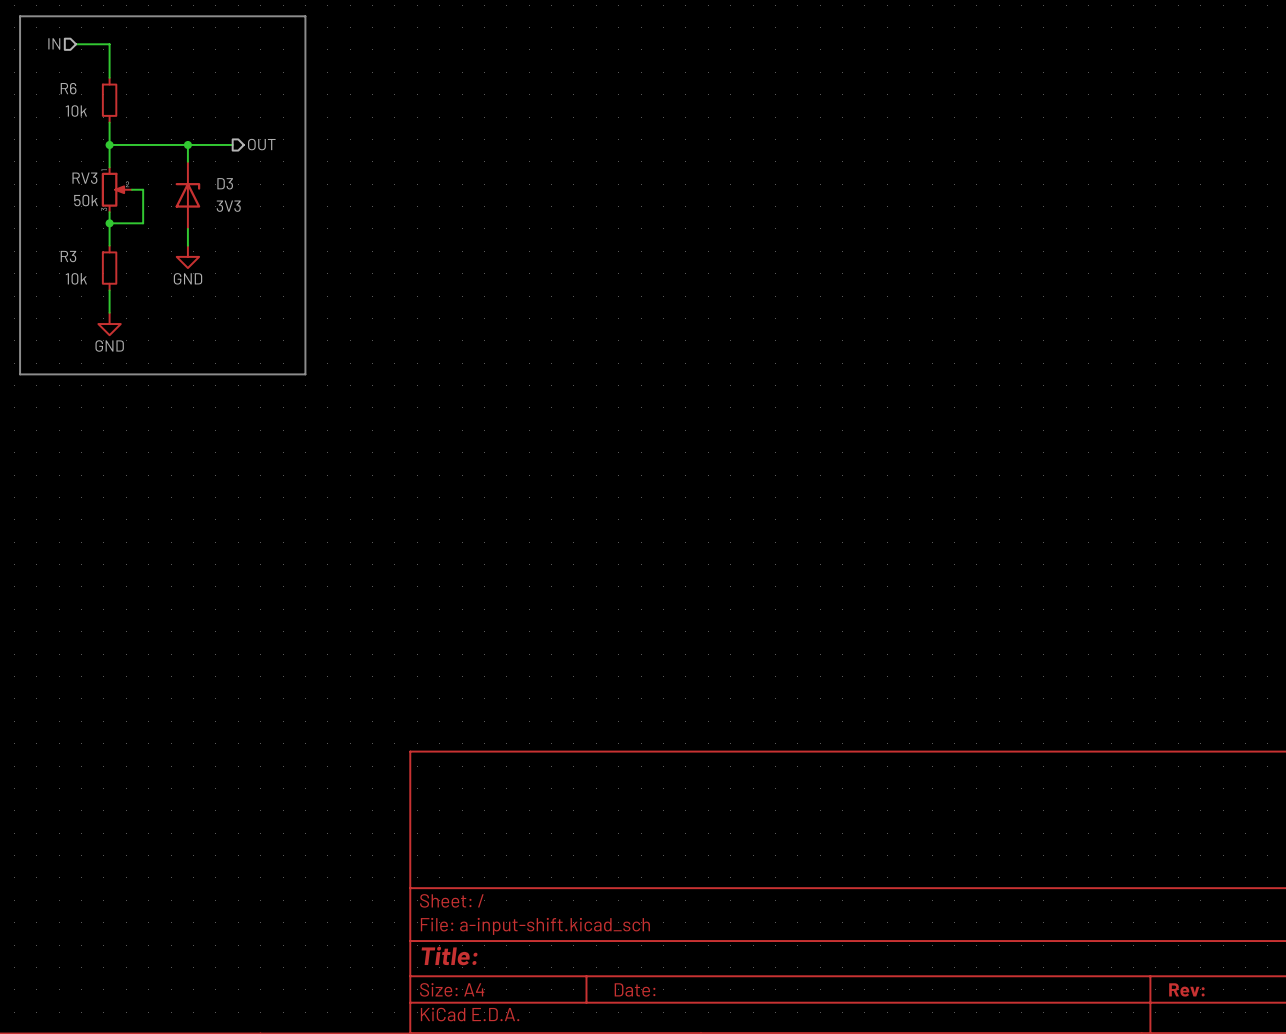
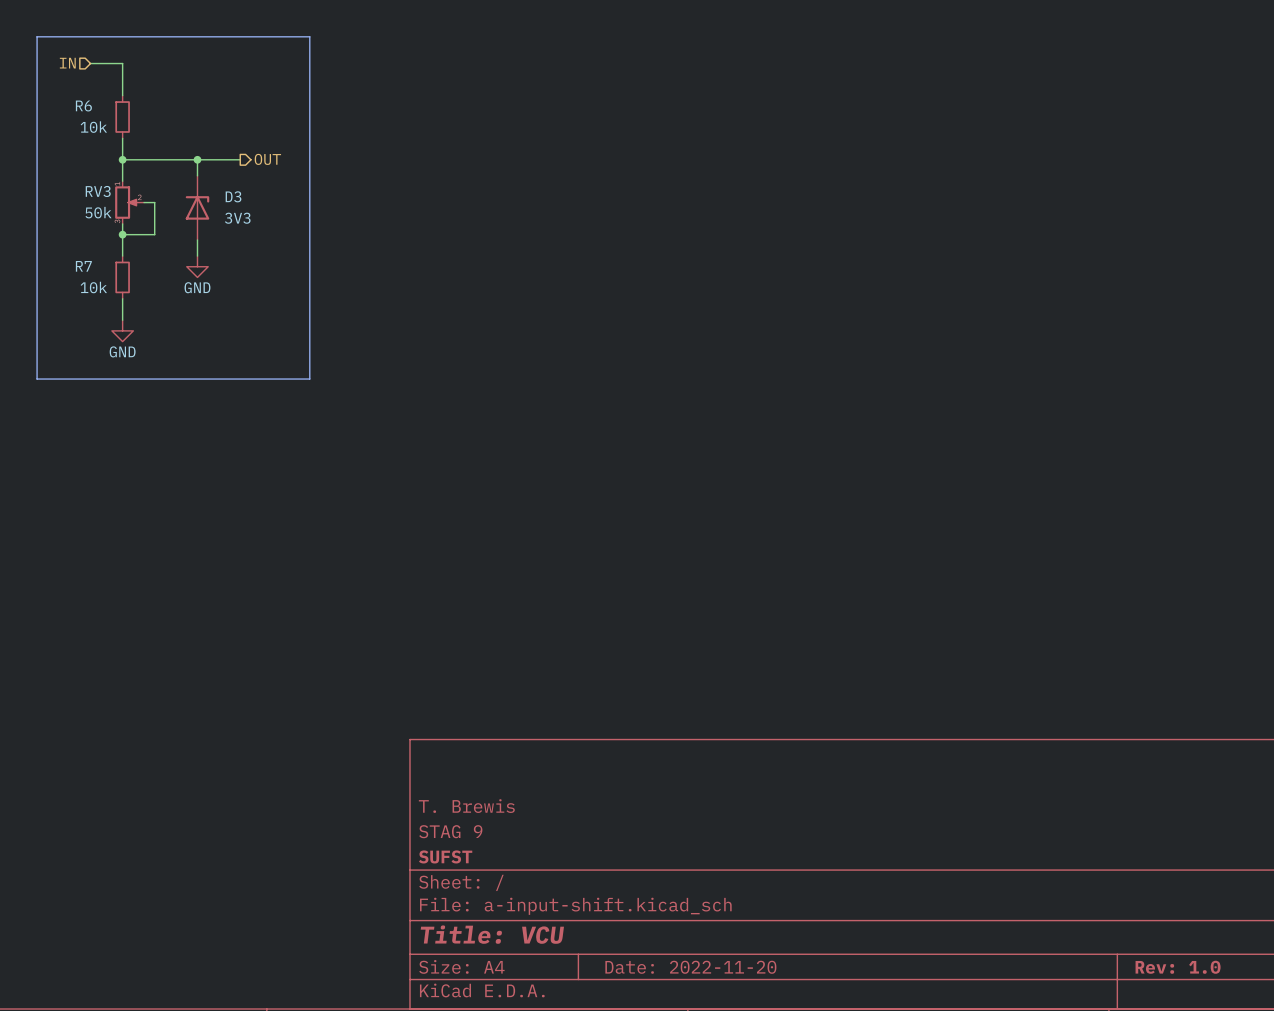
R3 name: R3 (68, 256) -> R7 (83, 266)
title block: none -> T. Brewis (466, 806)
title block: none -> STAG 9 (450, 831)
title block: none -> SUFST (445, 856)
title block: Title: (449, 955) -> Title: VCU (492, 934)
title block: Date: (635, 989) -> Date: 2022-11-20 (690, 967)
title block: Rev: (1186, 989) -> Rev: 1.0 (1178, 967)

